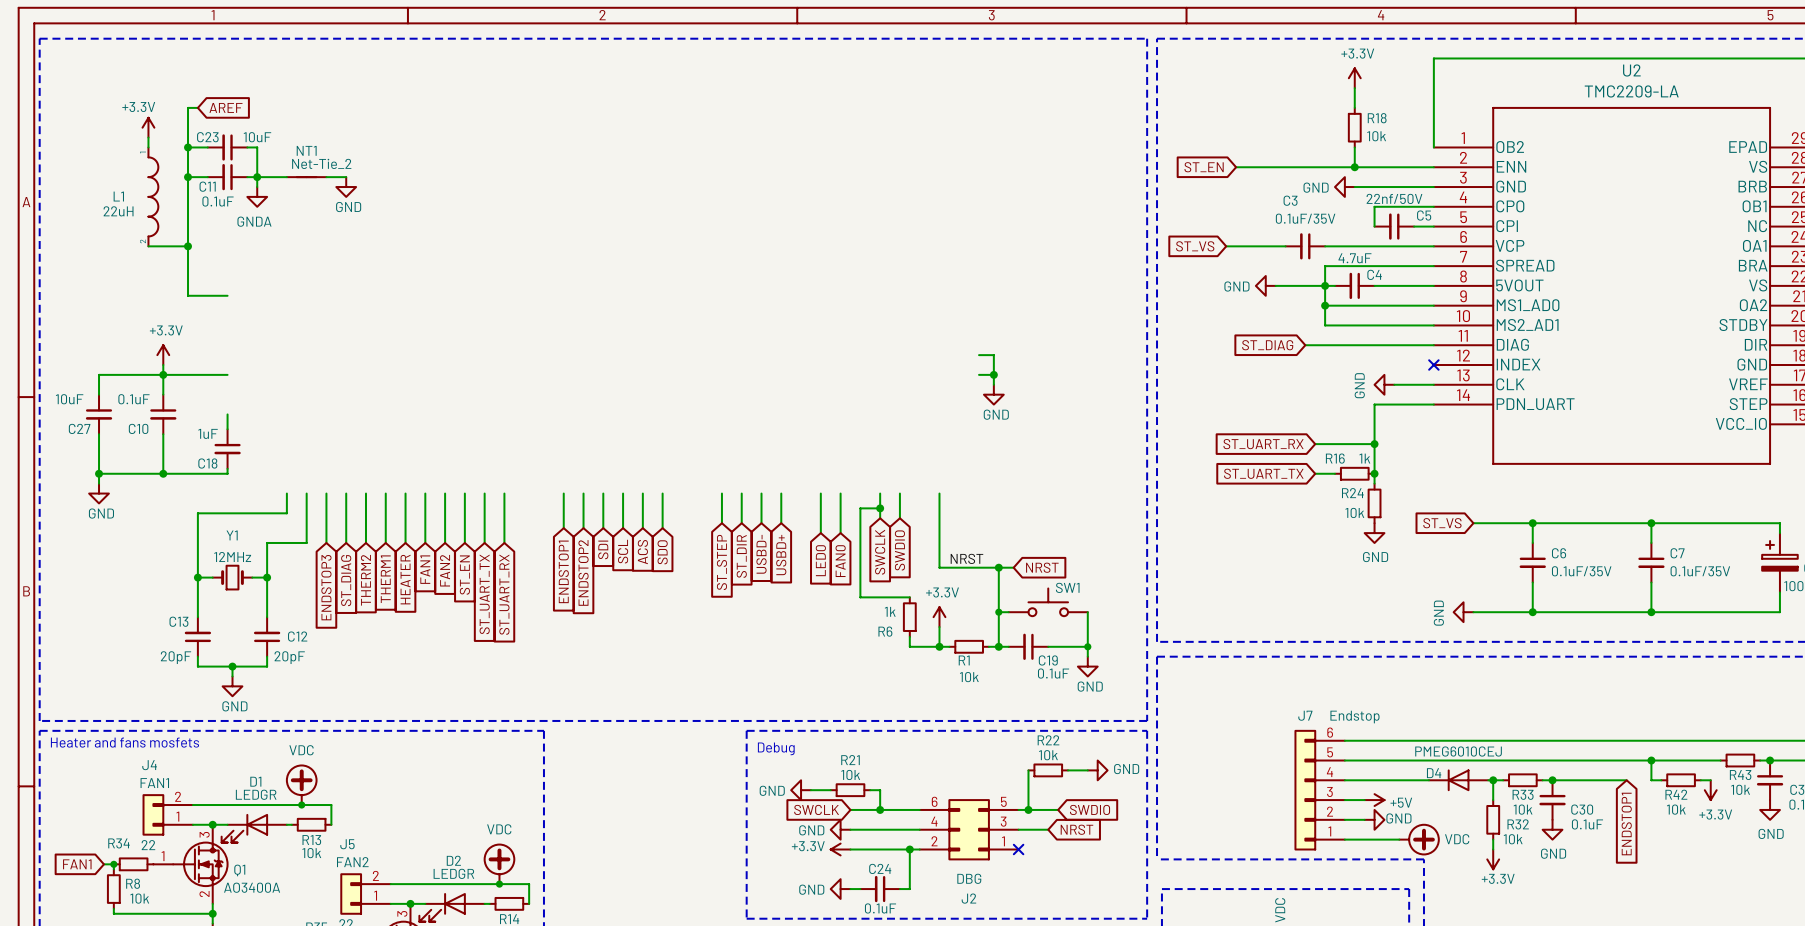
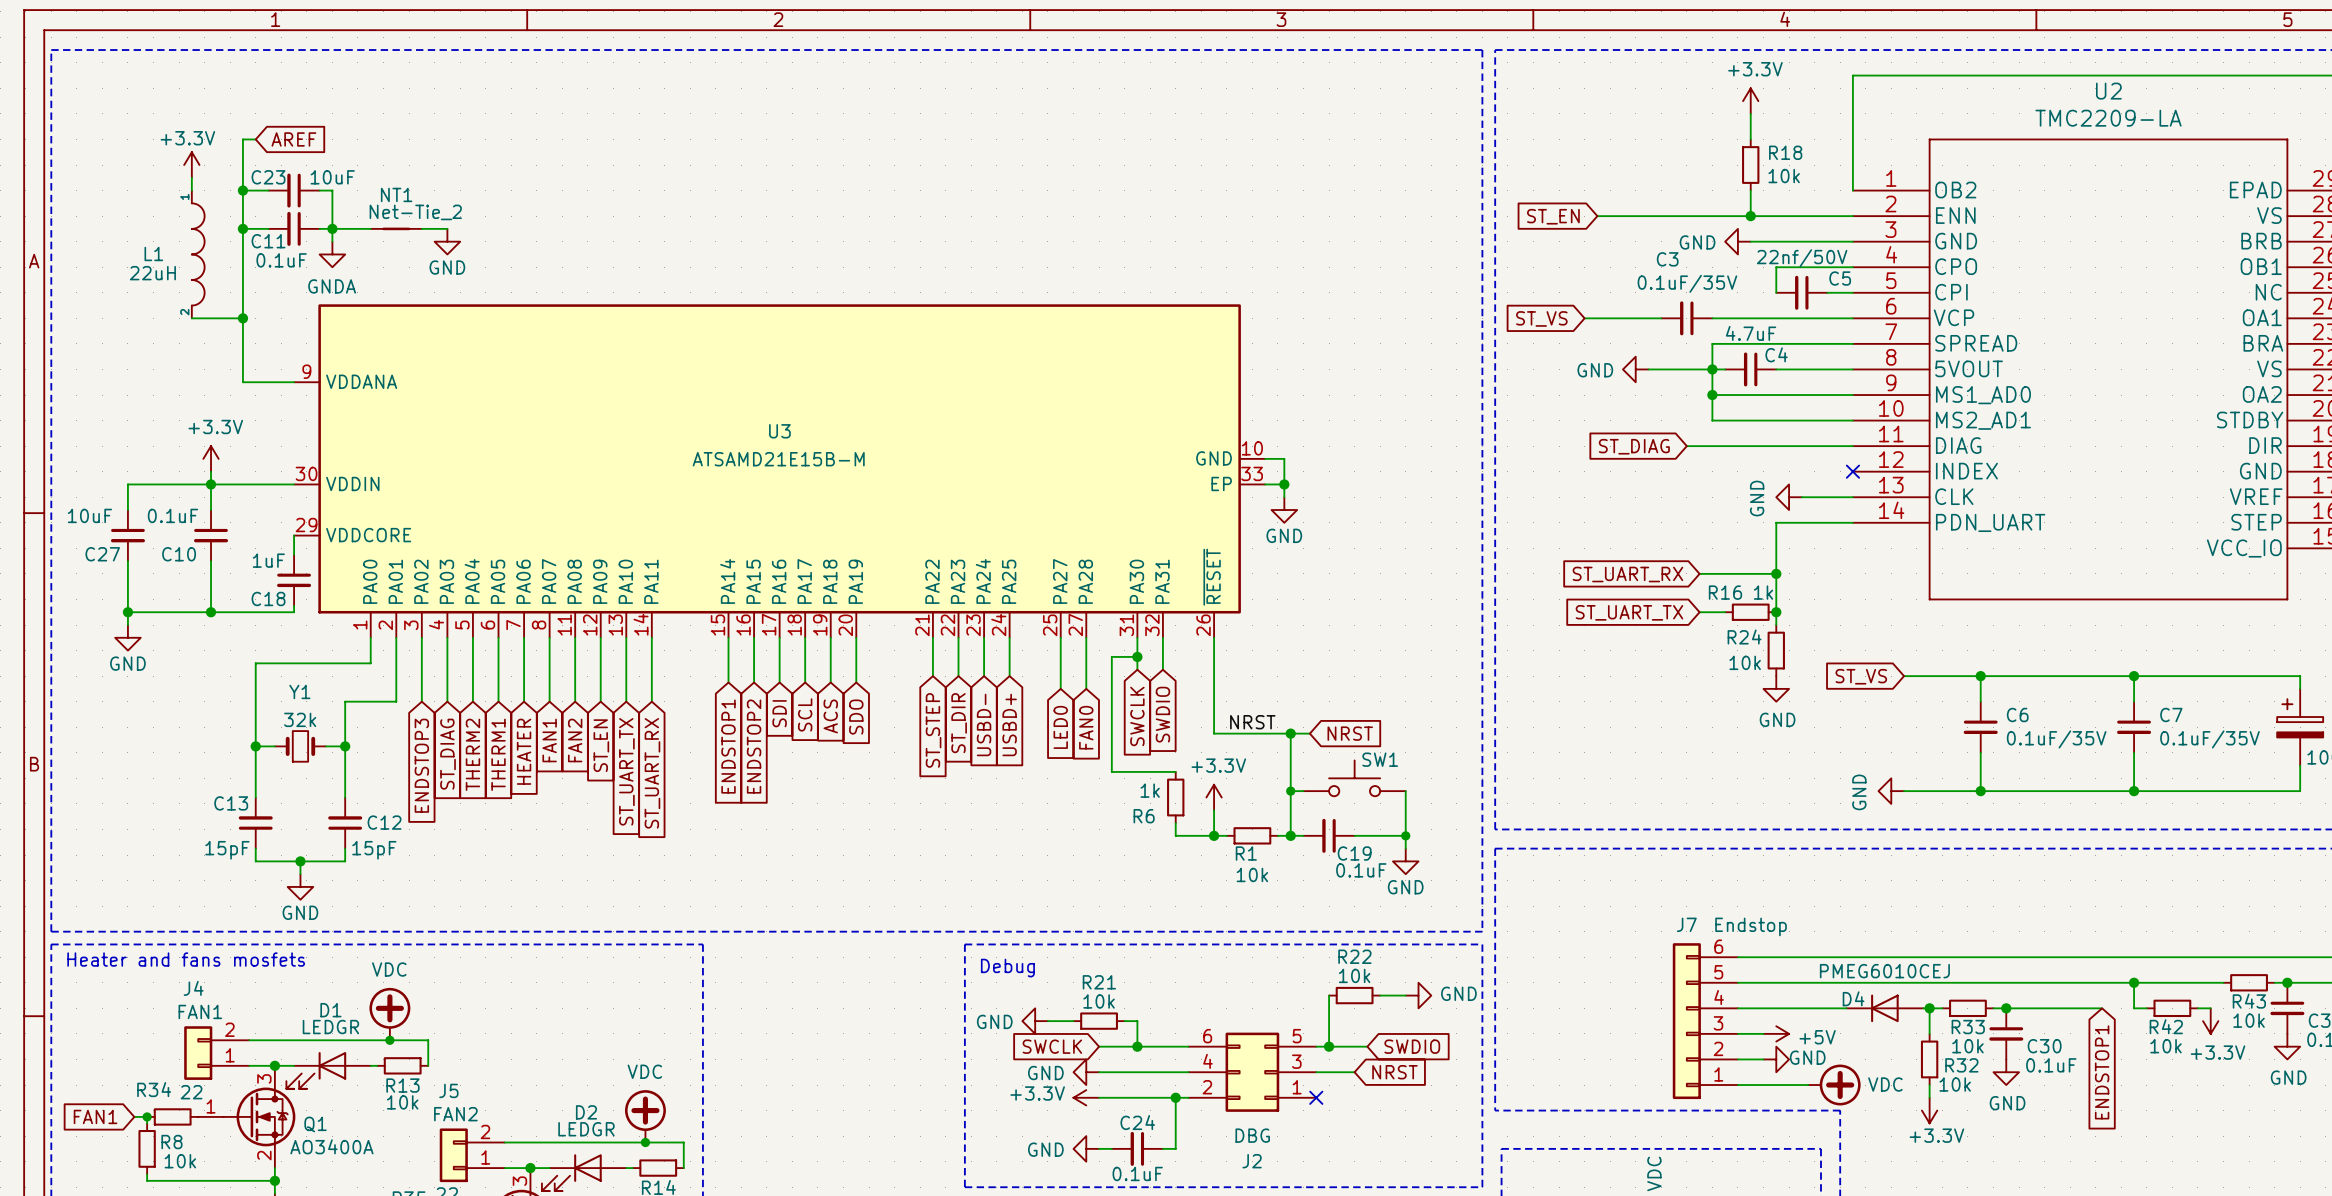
U3: none -> ATSAMD21E15B-M (779, 471)
Y1 value: 12MHz (232, 557) -> 32k (300, 719)
C13 value: 20pF (175, 657) -> 15pF (227, 850)
C12 value: 20pF (289, 657) -> 15pF (374, 850)

